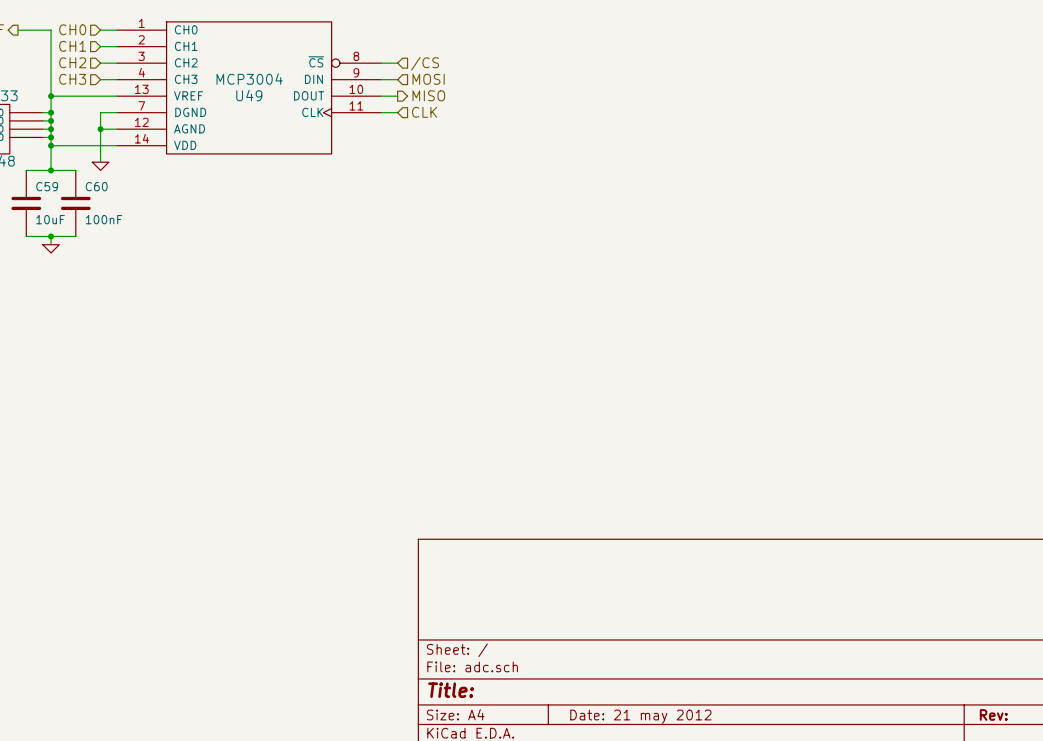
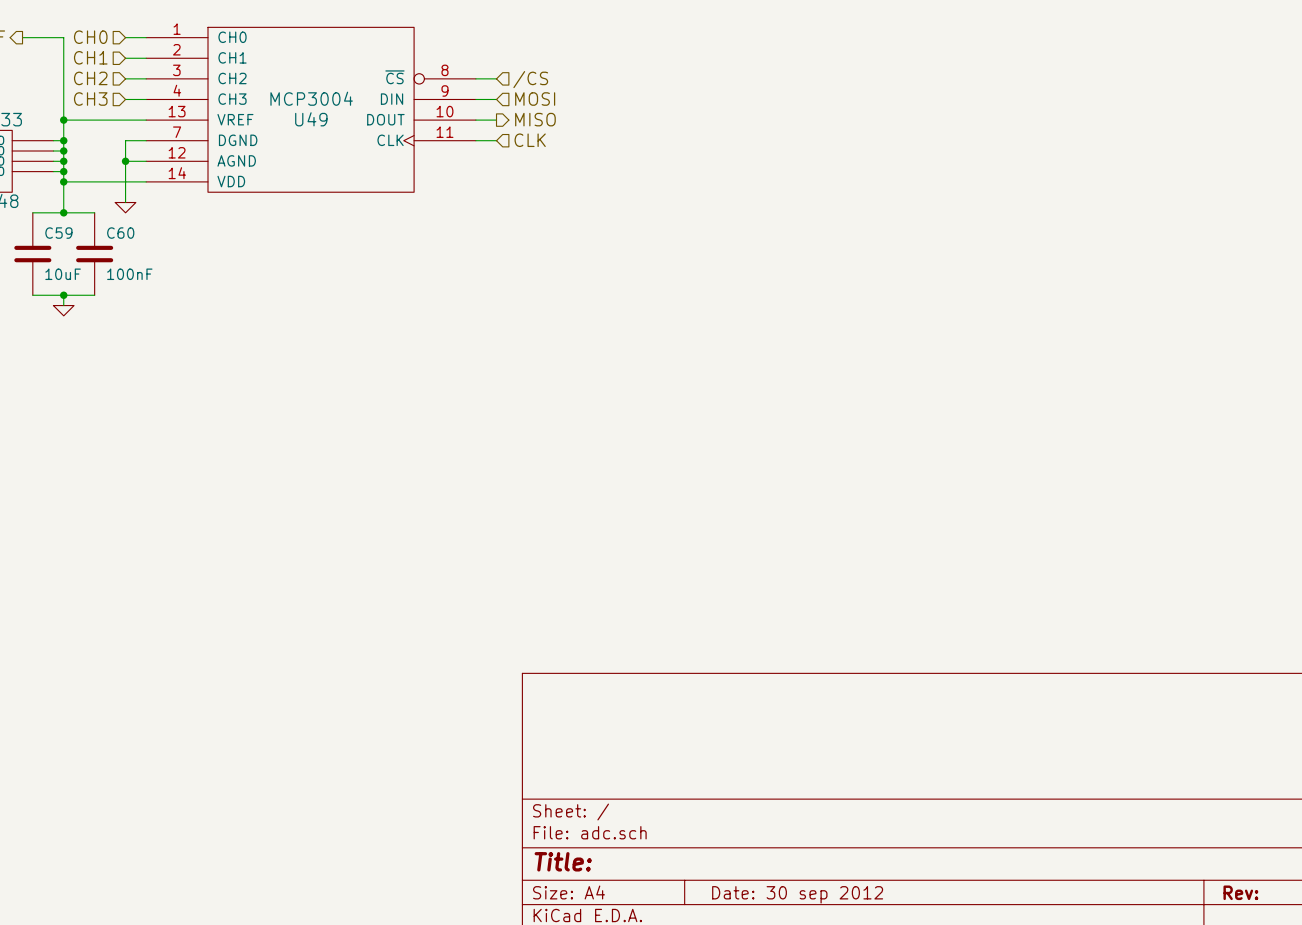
title block: Date: 21 may 2012 (640, 716) -> Date: 30 sep 2012 (797, 894)

